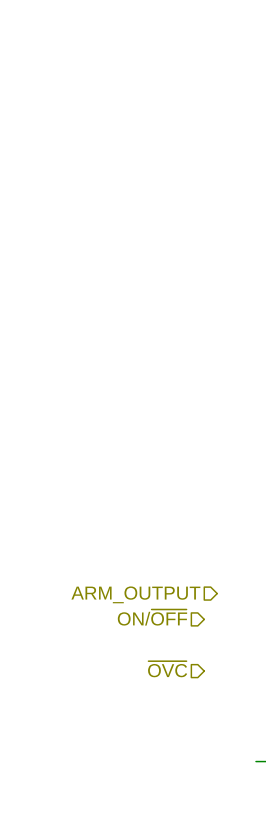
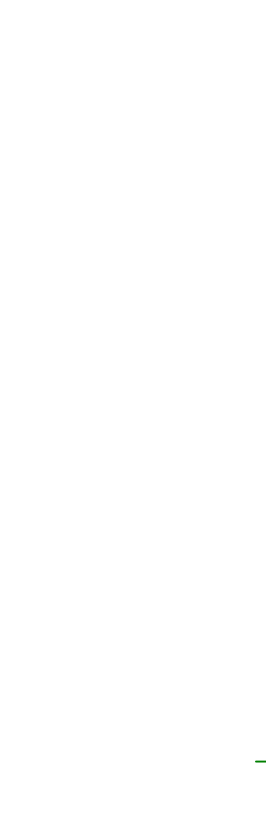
hierarchical label: ARM_OUTPUT (135, 594) -> none
hierarchical label: ON/~{OFF} (152, 617) -> none
hierarchical label: ~{OVC} (167, 669) -> none

